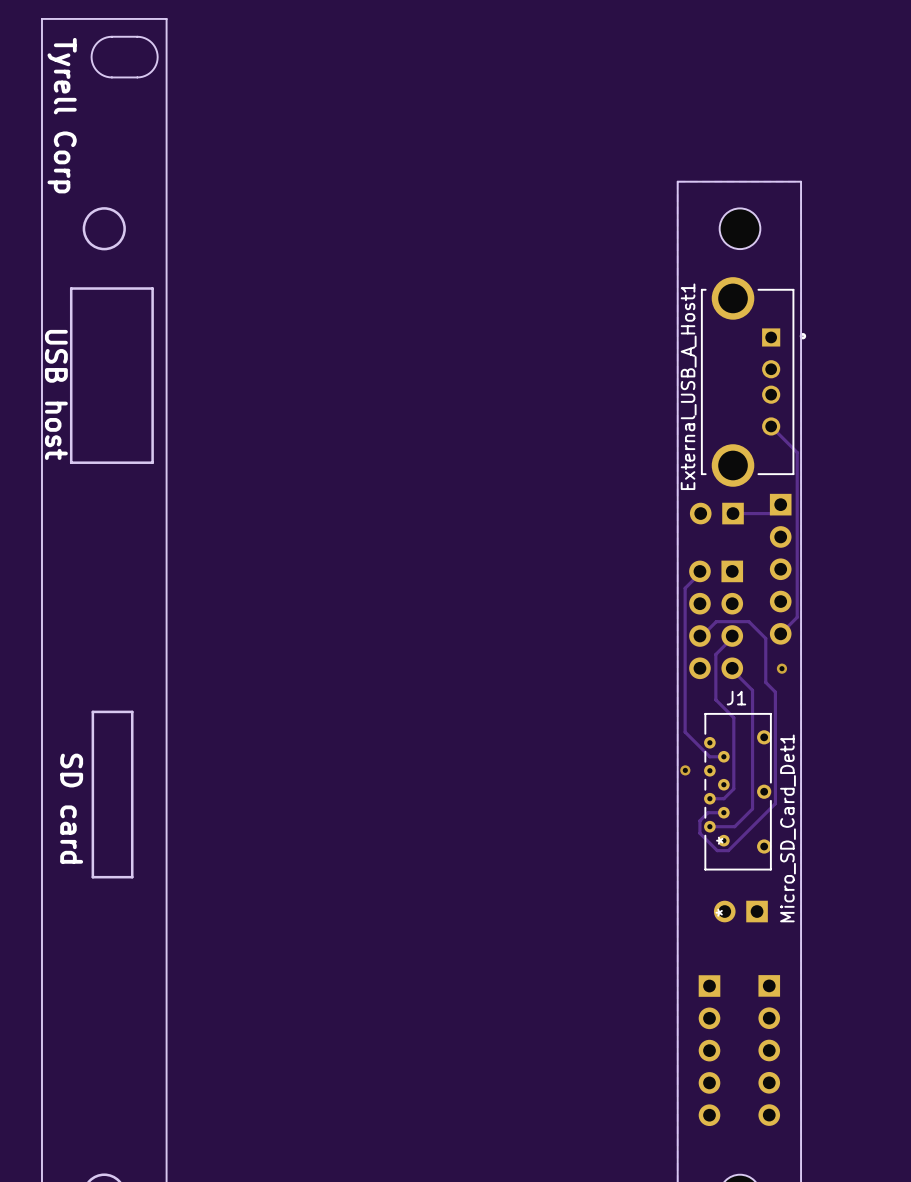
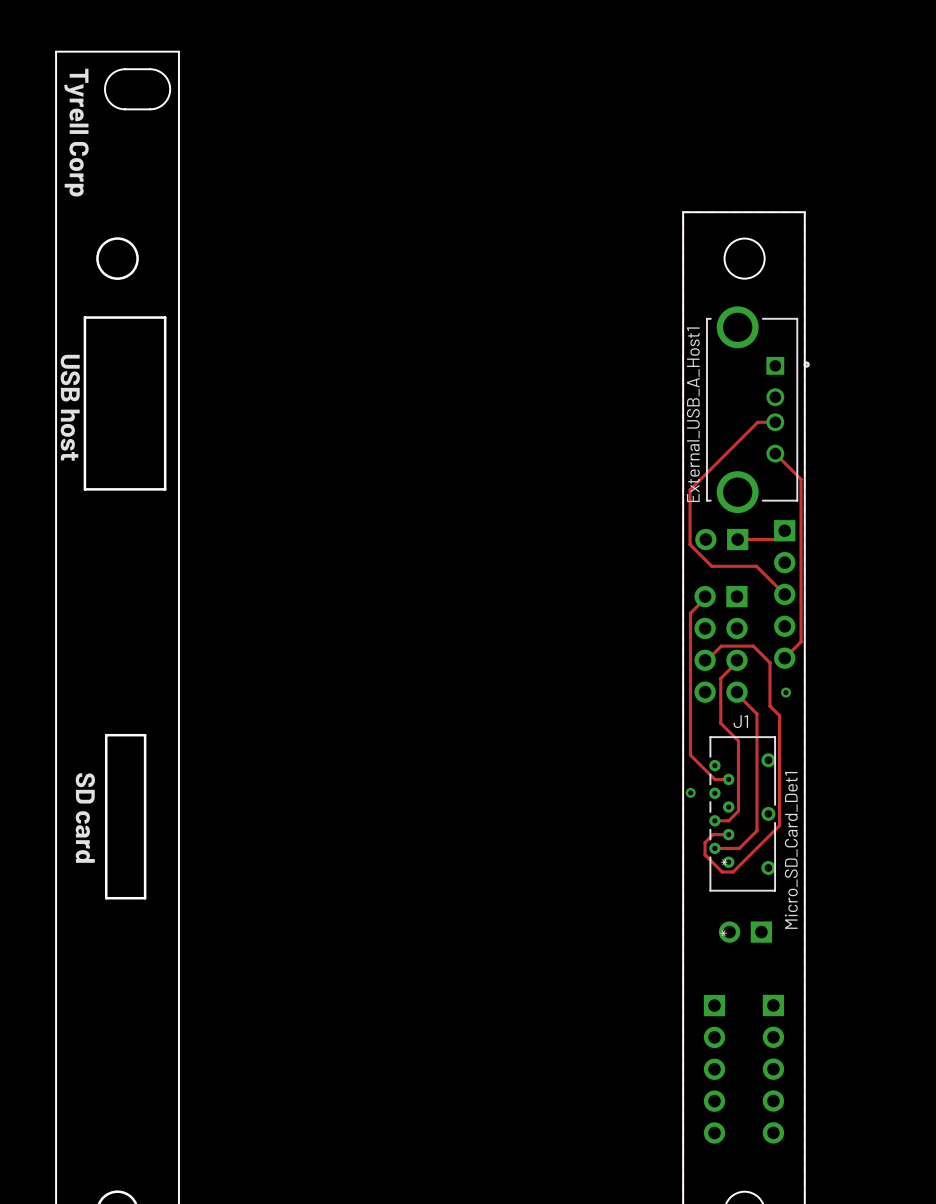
track: none -> (775, 422) (757, 422) (690, 489) (690, 544) (711, 566) (756, 566) (784, 594)

